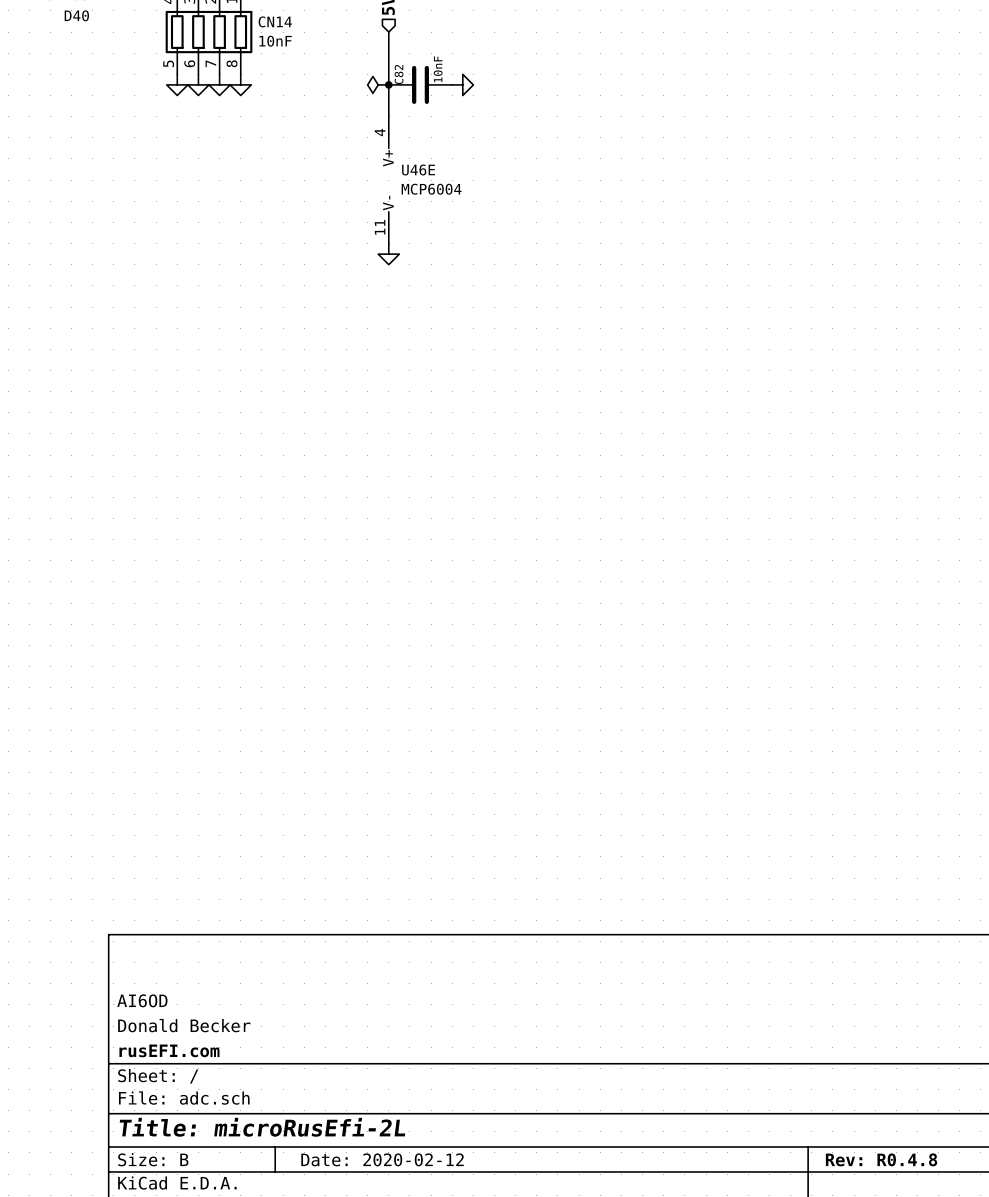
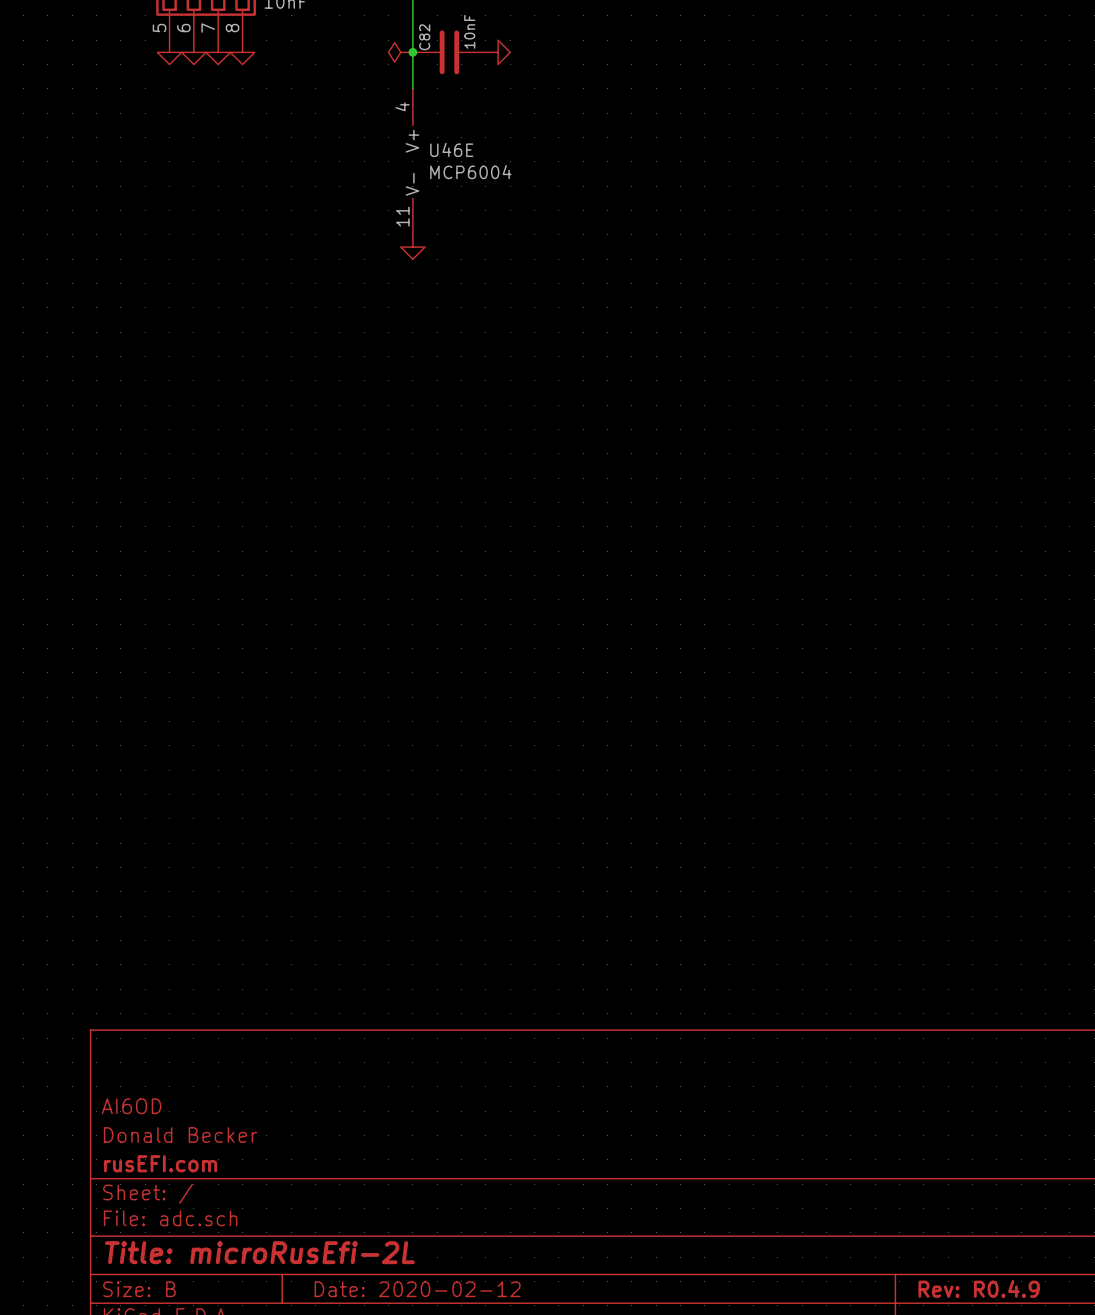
title block: Rev: R0.4.8 (881, 1159) -> Rev: R0.4.9 (979, 1288)

